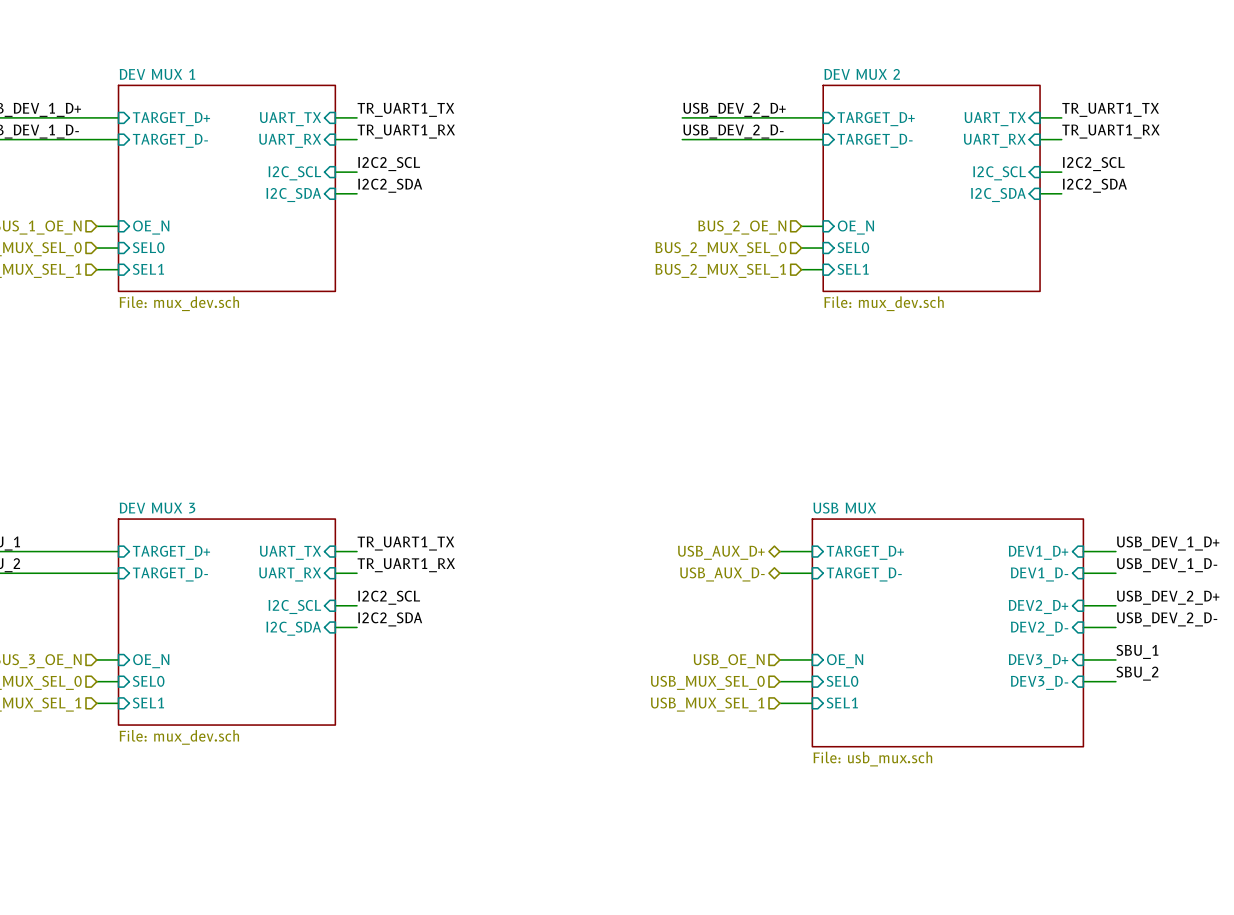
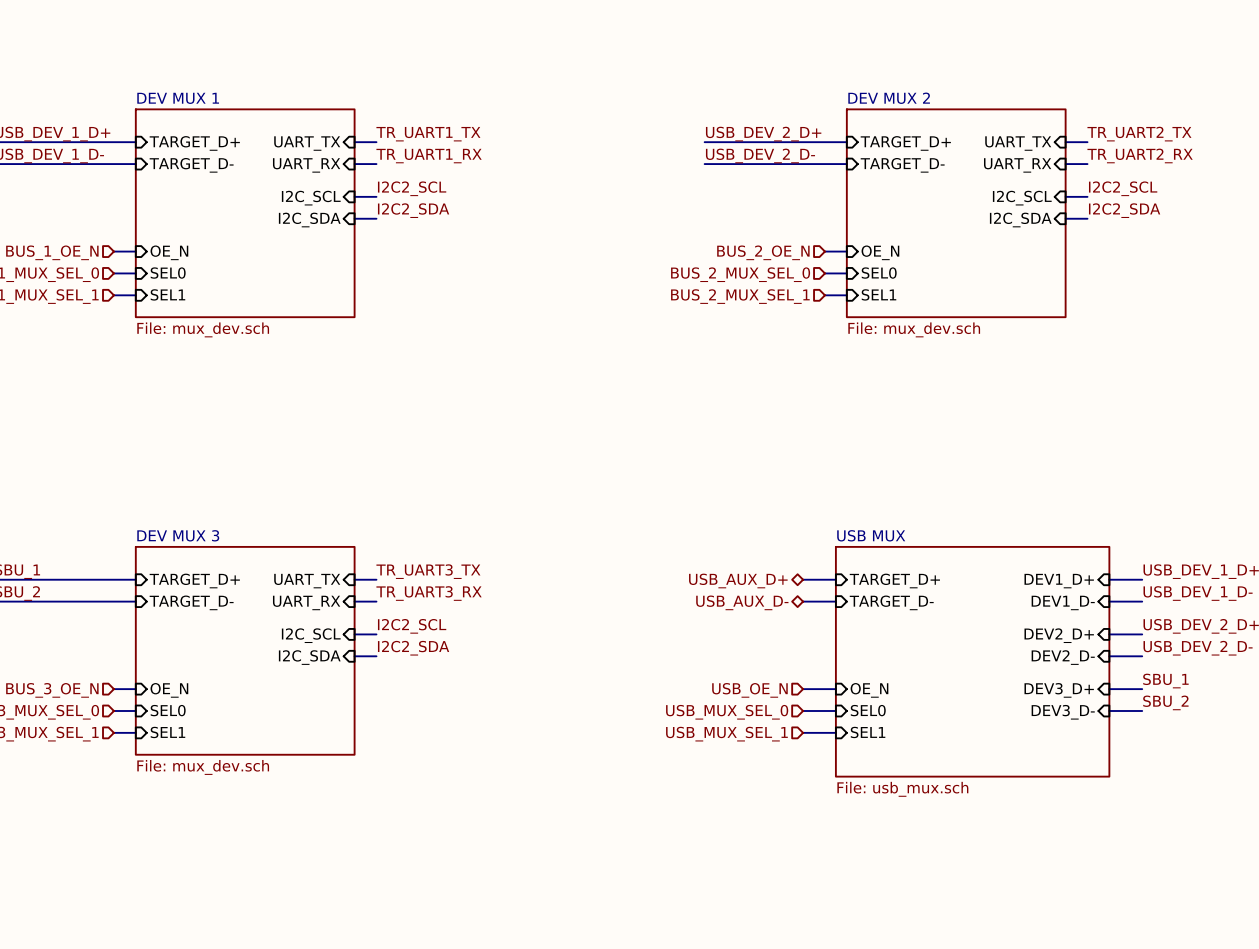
label: TR_UART1_TX (1110, 109) -> TR_UART2_TX (1139, 134)
label: TR_UART1_RX (1110, 131) -> TR_UART2_RX (1140, 155)
label: TR_UART1_TX (405, 543) -> TR_UART3_TX (428, 571)
label: TR_UART1_RX (406, 565) -> TR_UART3_RX (429, 593)

